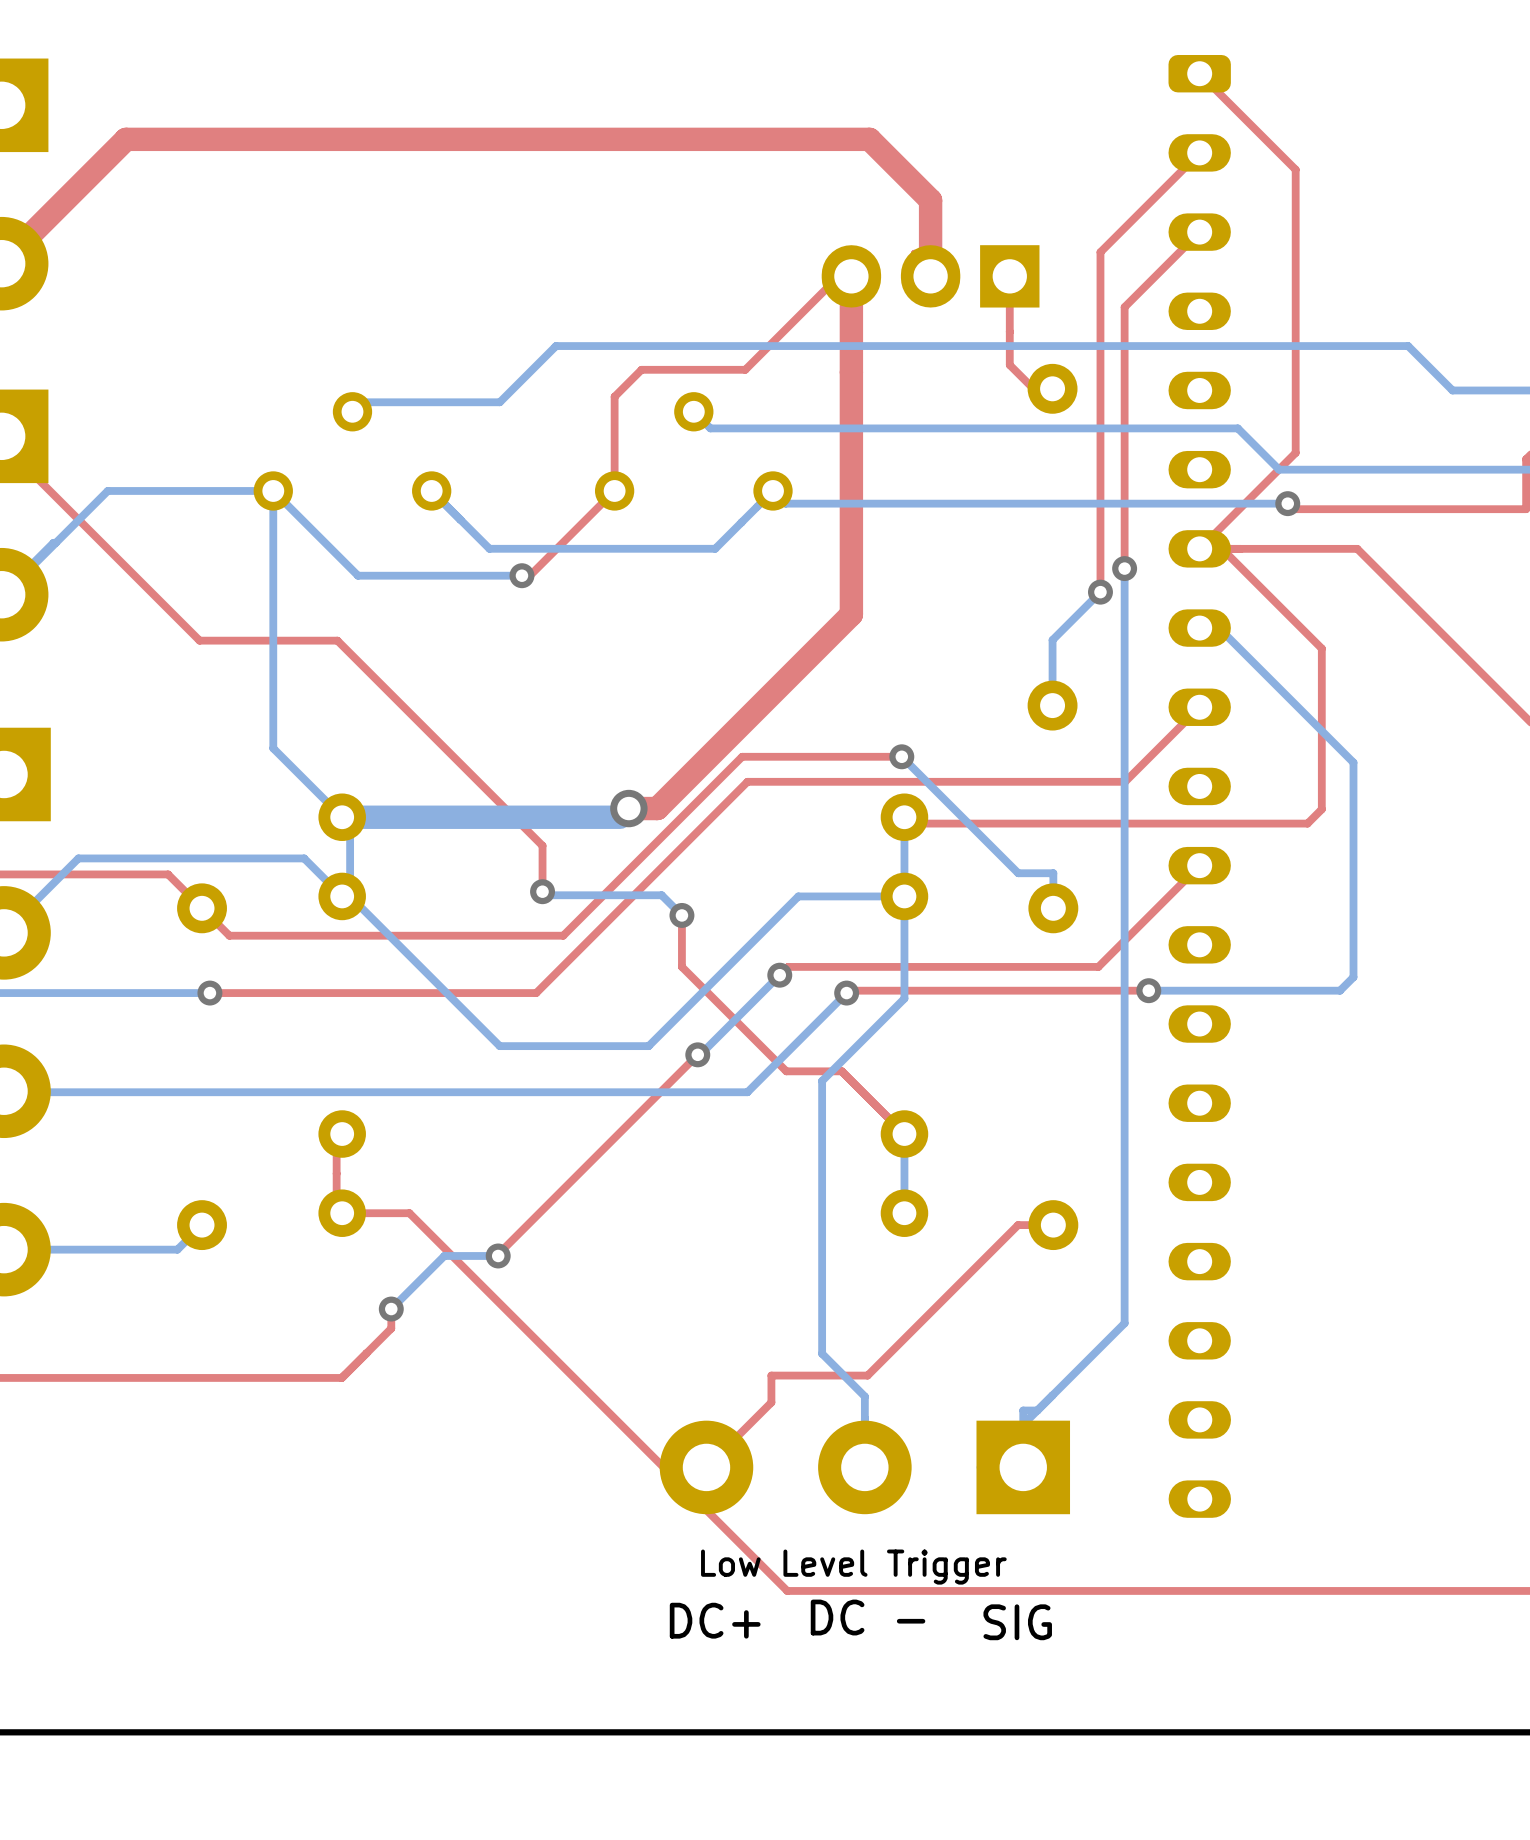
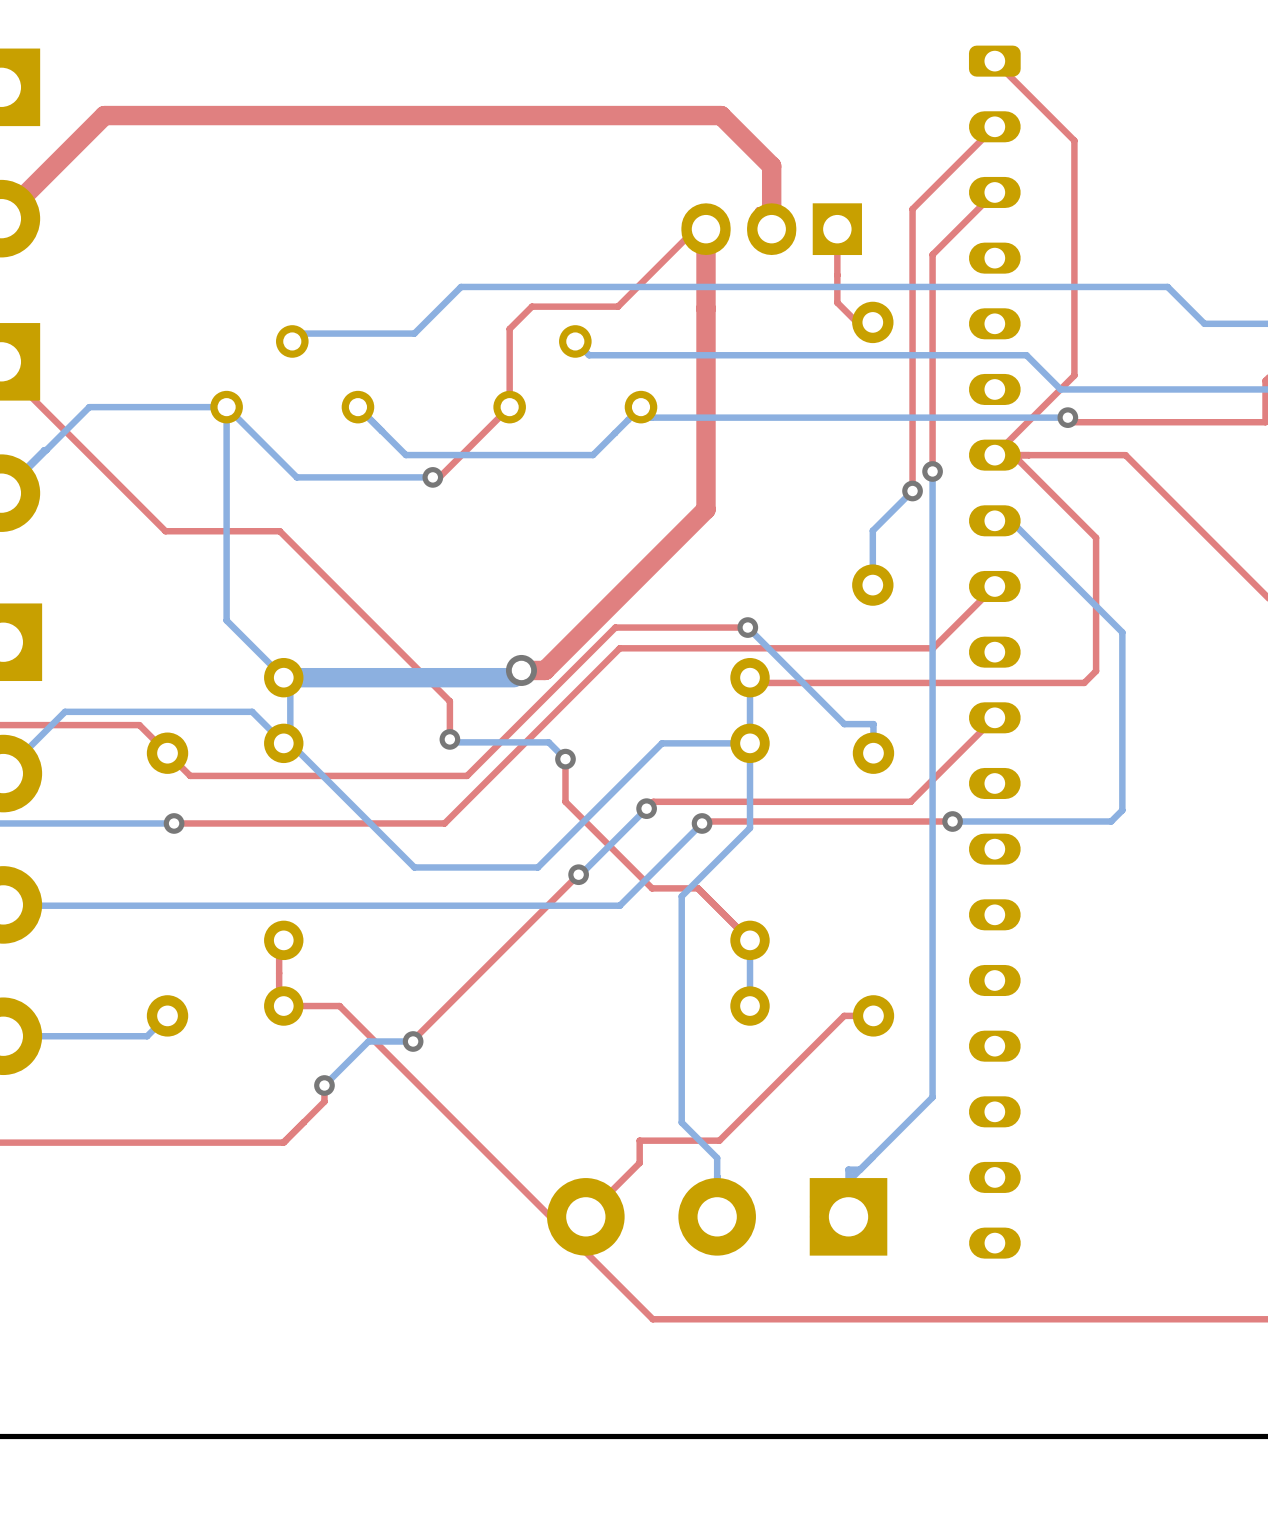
text: Low Level Trigger (853, 1567) -> none
text: DC - (868, 1617) -> none
text: DC+ (715, 1620) -> none
text: SIG (1017, 1622) -> none

